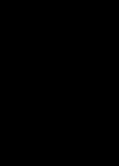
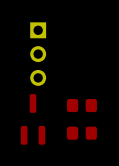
part: none -> (38, 54)
part: none -> (81, 105)
part: none -> (33, 119)
part: none -> (81, 133)

